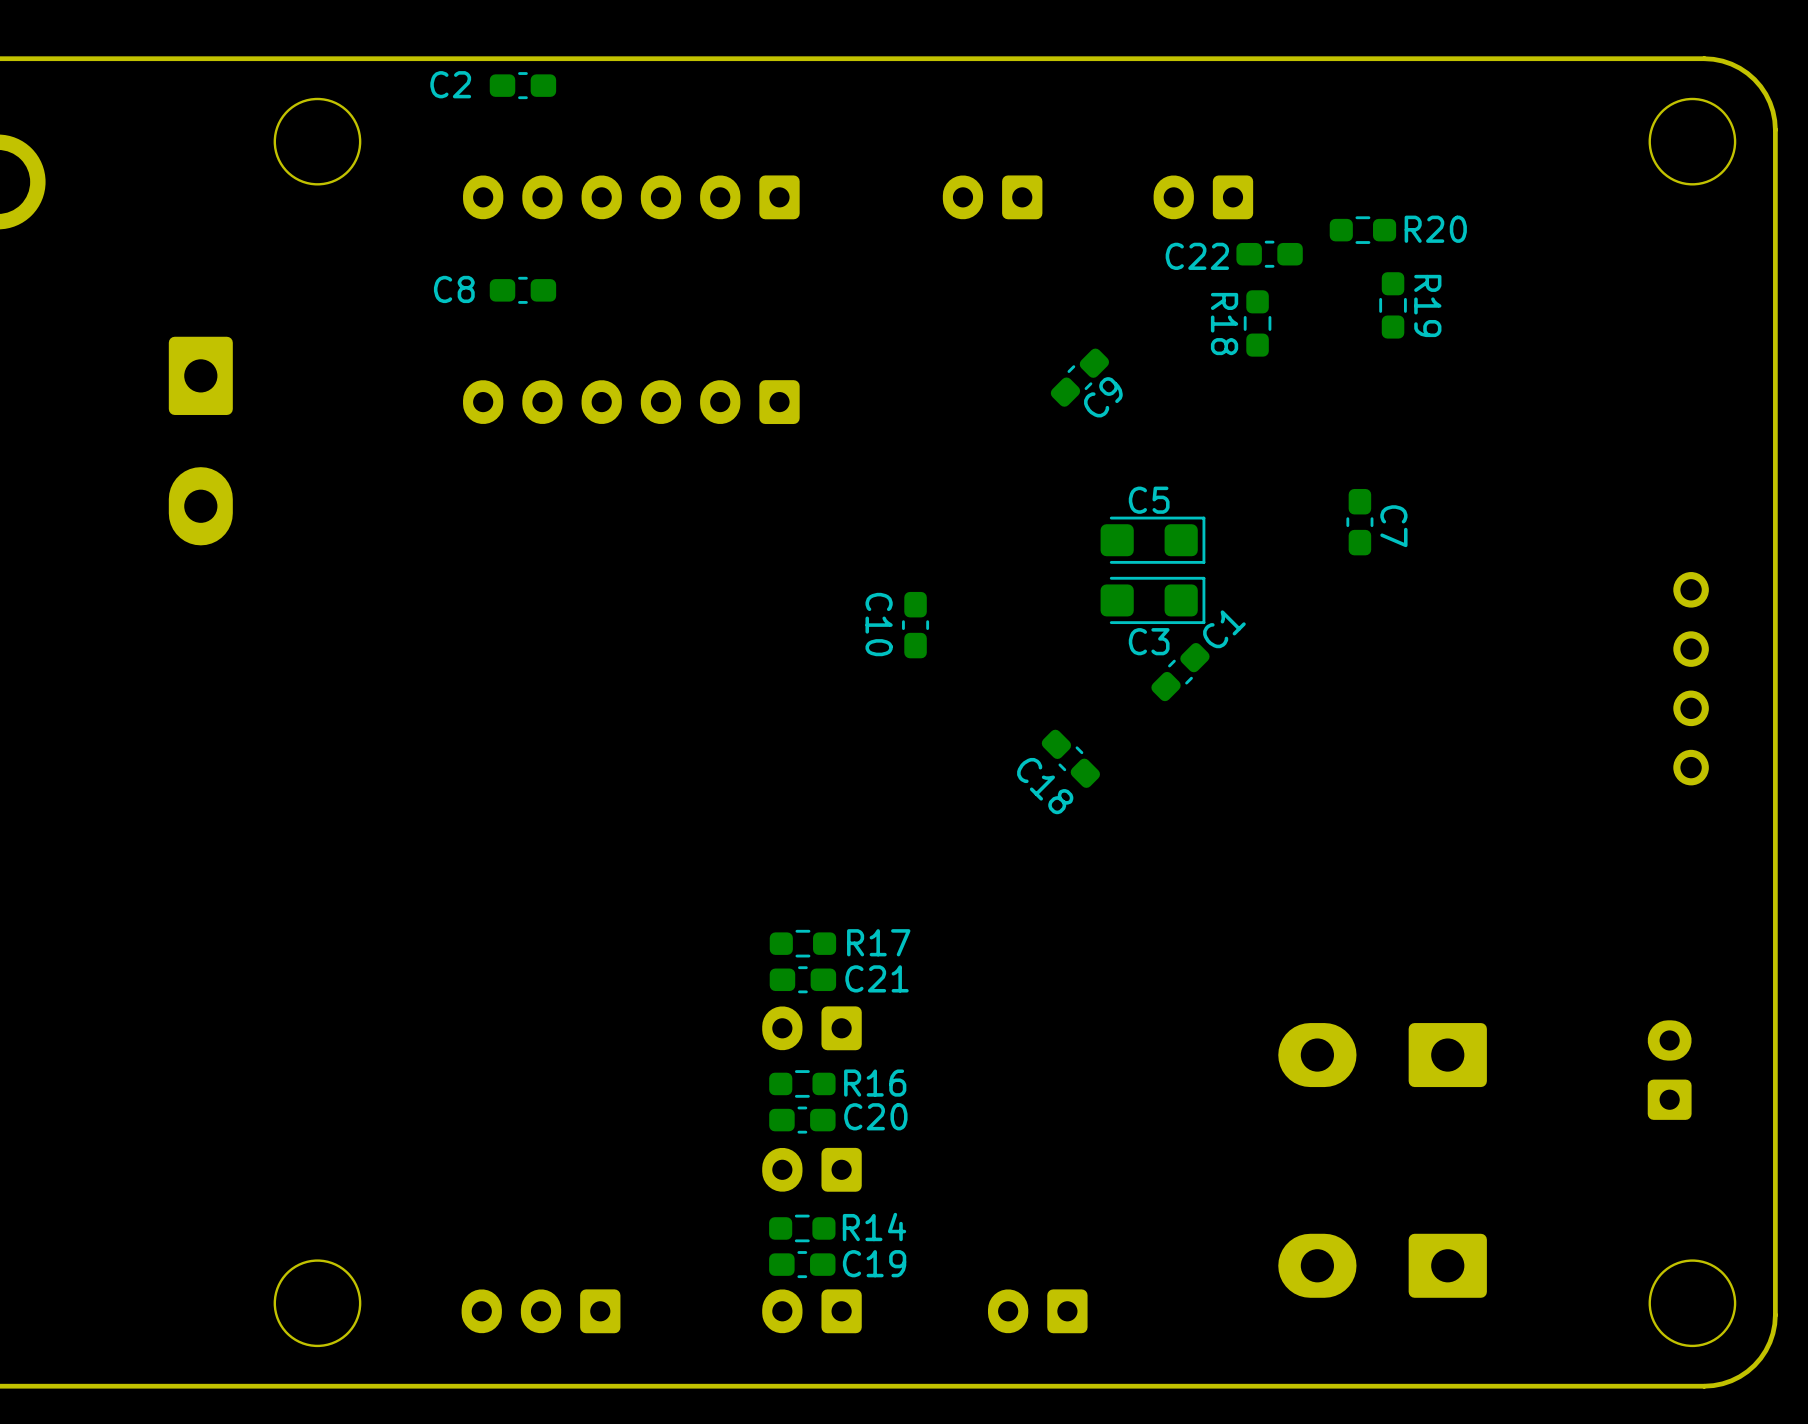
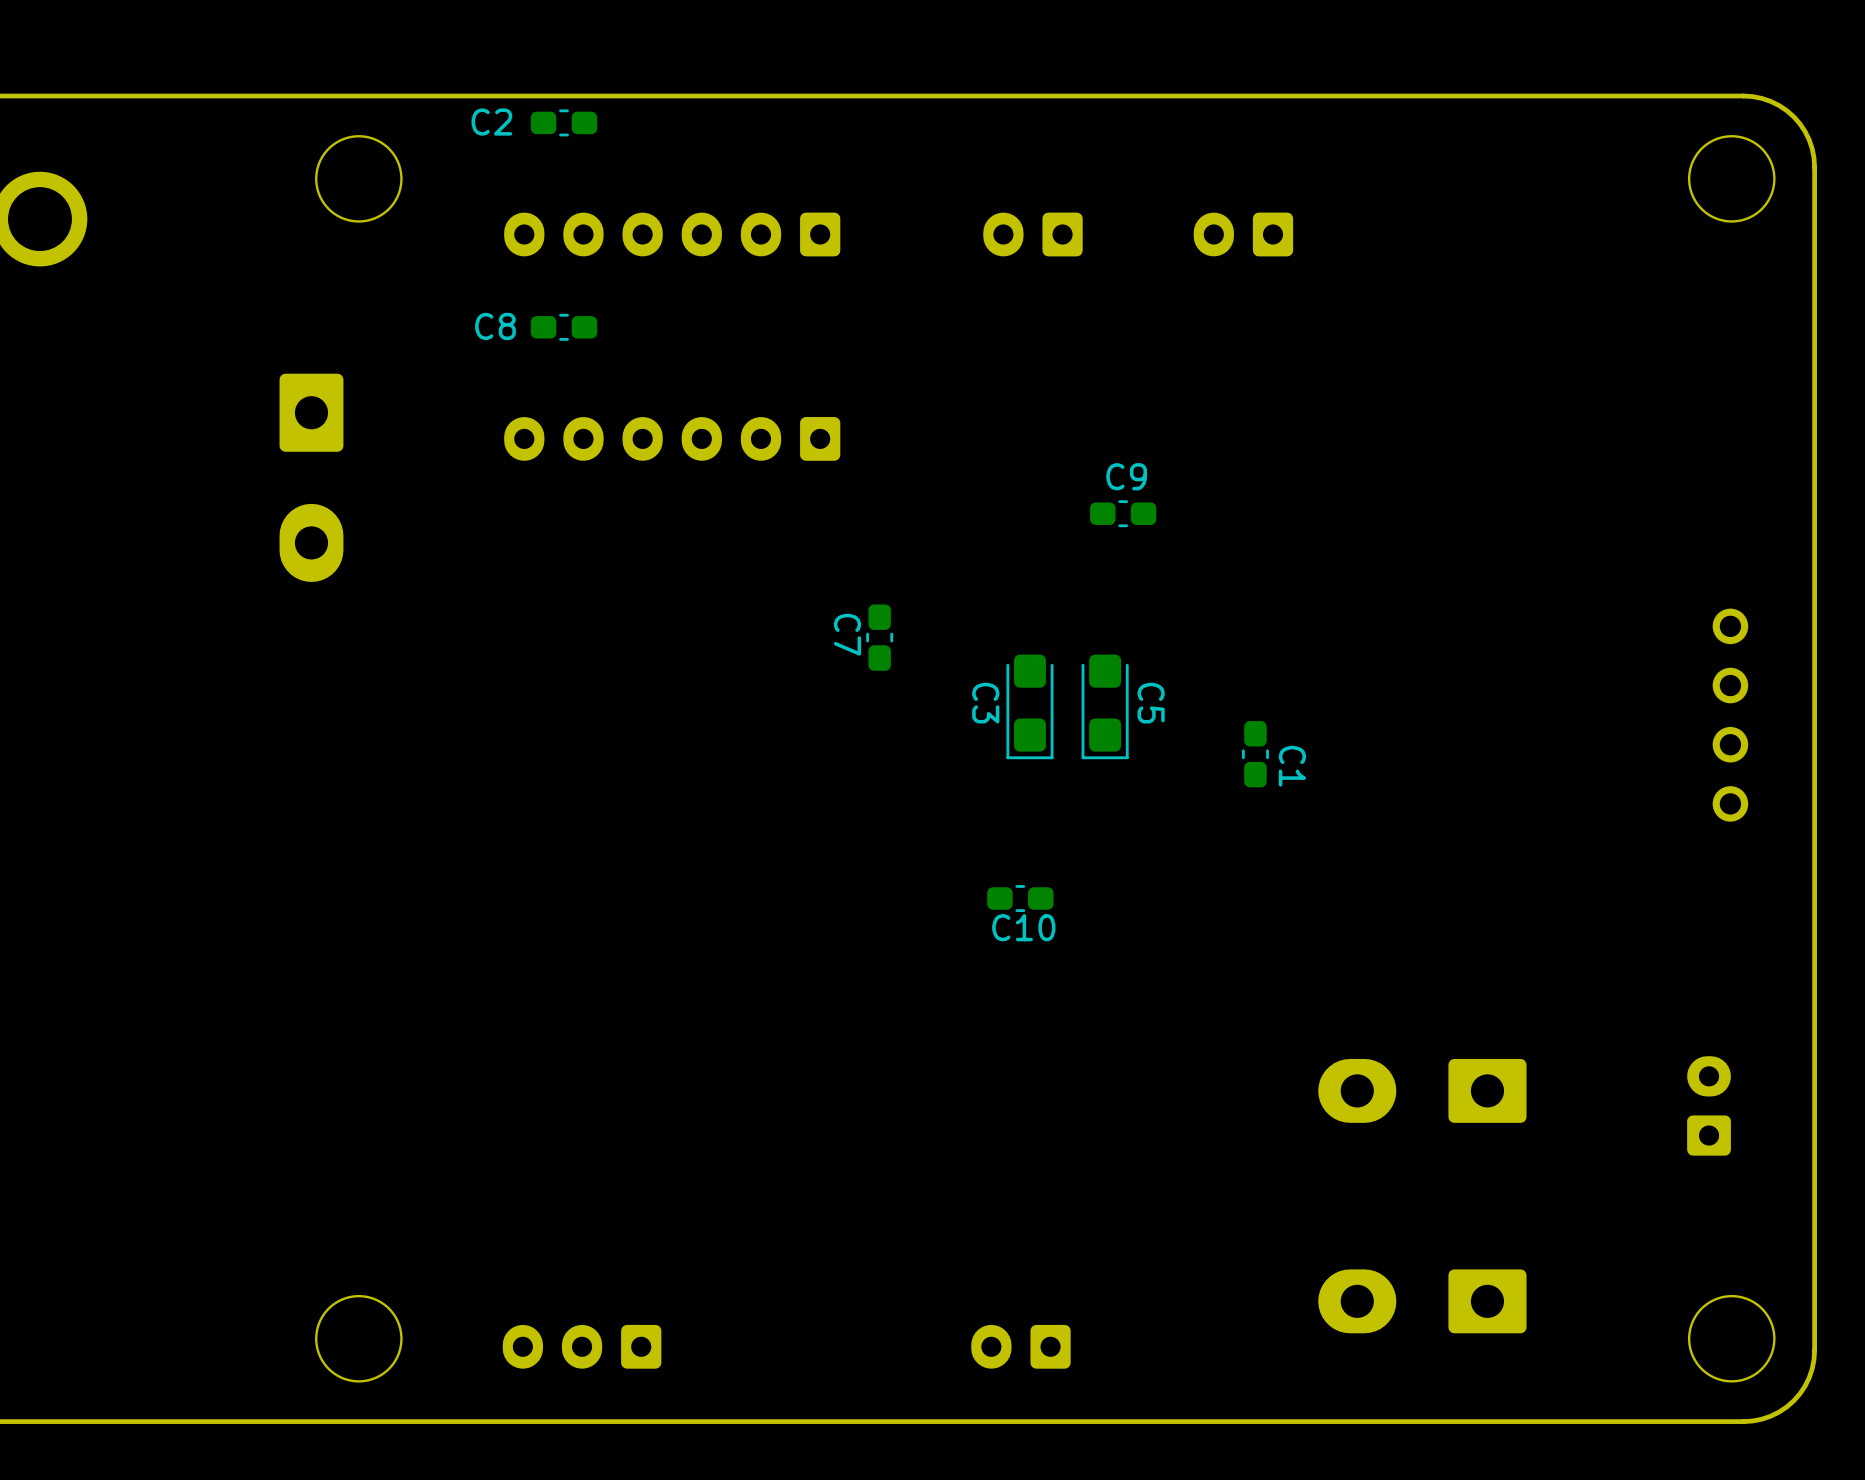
R20: (1362, 230) -> none
C22: (1269, 254) -> none
R19: (1393, 305) -> none
R18: (1257, 323) -> none
C9 rotation: 0° (1079, 377) -> 45° clockwise (1123, 513)
C9 position: (1079, 377) -> (1123, 513)
C9 name position: C9 (1103, 397) -> C9 (1126, 476)
part position: (200, 441) -> (311, 477)
C7 position: (1359, 522) -> (879, 637)
C7 name position: C7 (1393, 526) -> C7 (847, 634)
C5 rotation: 0° (1152, 540) -> 90° clockwise (1105, 706)
C5 position: (1152, 540) -> (1105, 706)
C3 rotation: 0° (1152, 600) -> 90° clockwise (1029, 706)
C3 position: (1152, 600) -> (1029, 706)
C10 name position: C10 (879, 624) -> C10 (1023, 927)
C10 rotation: 0° (915, 625) -> 90° clockwise (1020, 898)
C10 position: (915, 625) -> (1020, 898)
C1 name position: C1 (1224, 629) -> C1 (1292, 766)
C1 rotation: 0° (1180, 672) -> 45° counterclockwise (1255, 754)
C1 position: (1180, 672) -> (1255, 754)
C18: (1070, 758) -> none
R17: (802, 943) -> none
C21: (802, 979) -> none
part: (811, 1028) -> none
R16: (802, 1083) -> none
C20: (802, 1120) -> none
part: (811, 1169) -> none
R14: (802, 1228) -> none
C19: (802, 1264) -> none
part: (811, 1311) -> none
part position: (1037, 1311) -> (1020, 1346)

